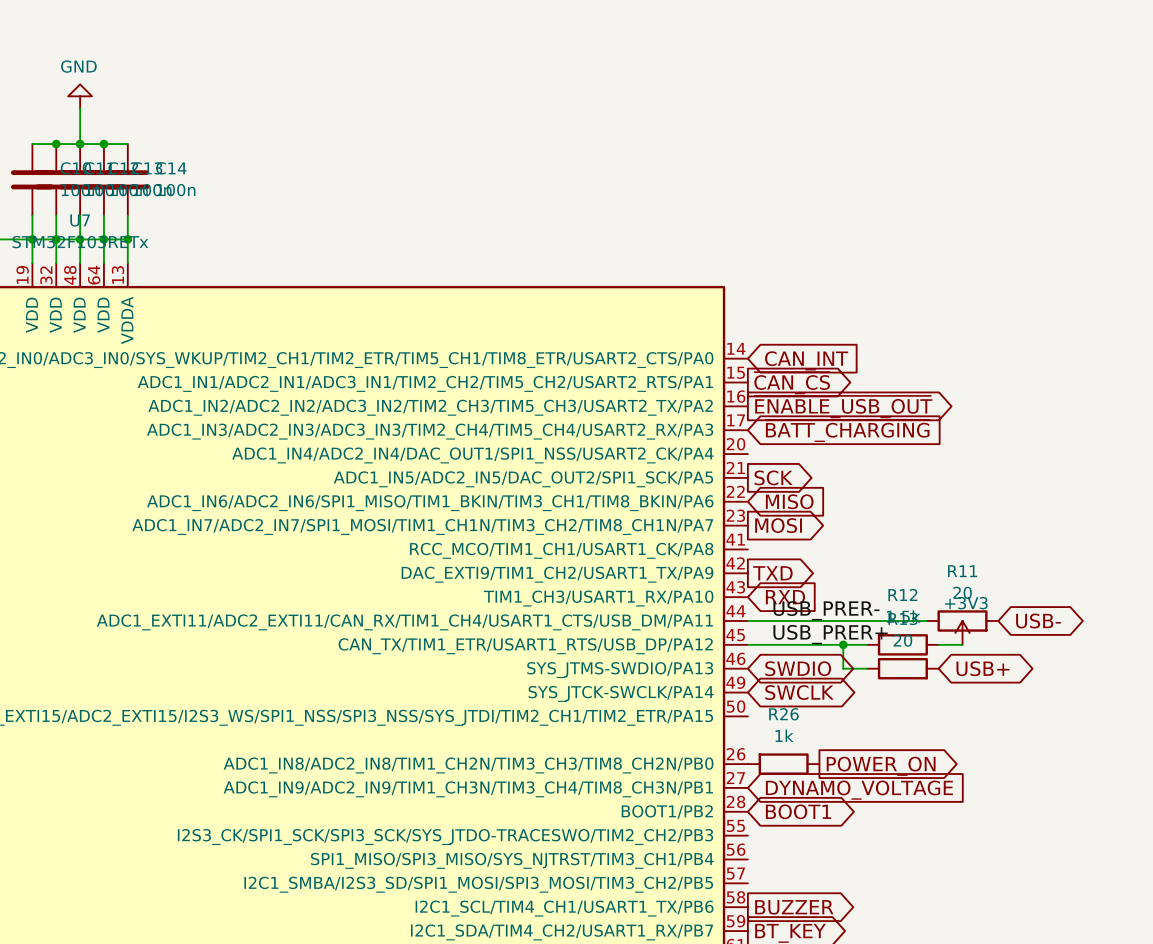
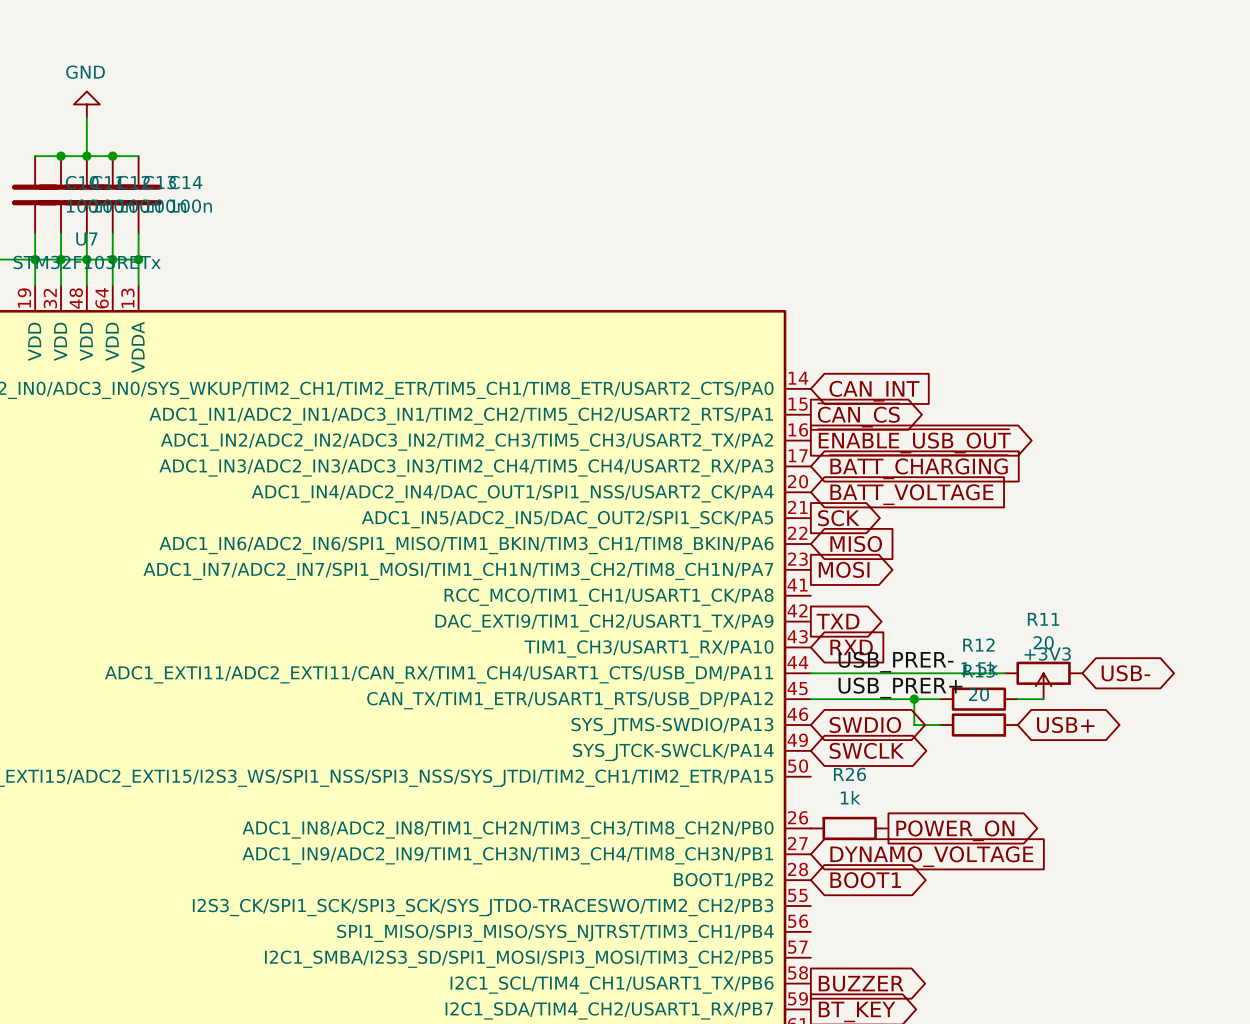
global label: none -> BATT_VOLTAGE (911, 494)

